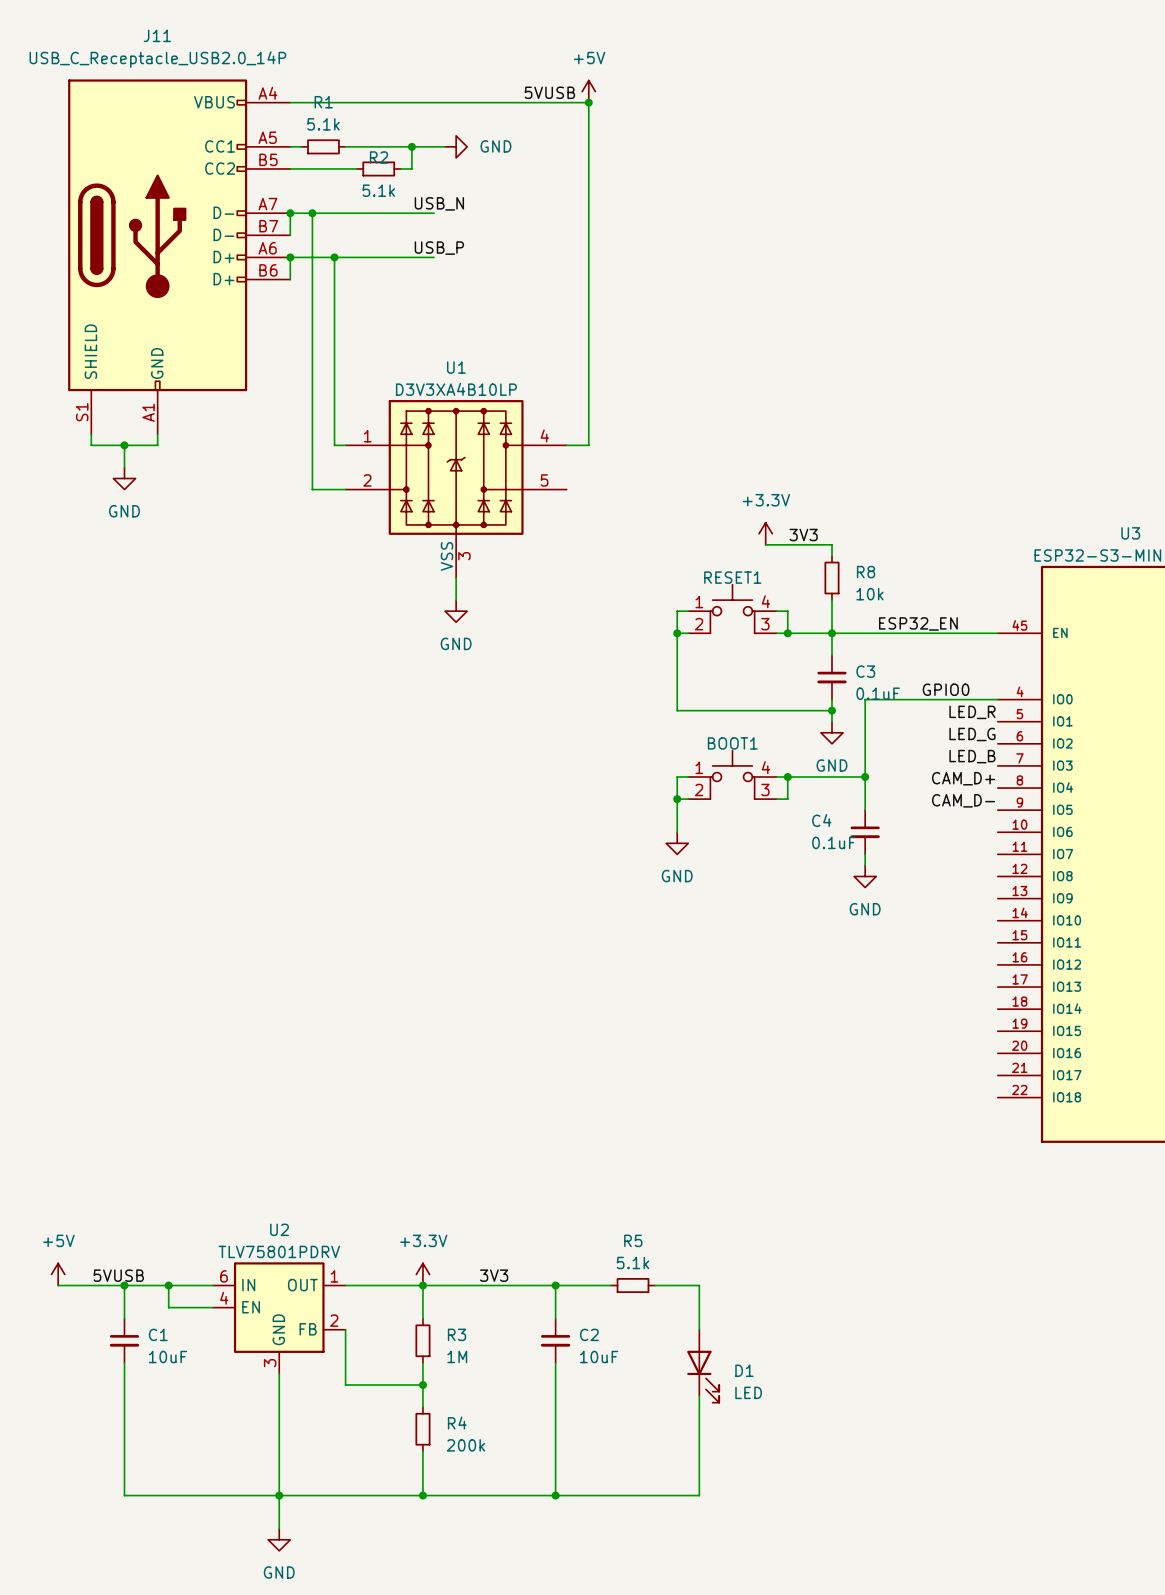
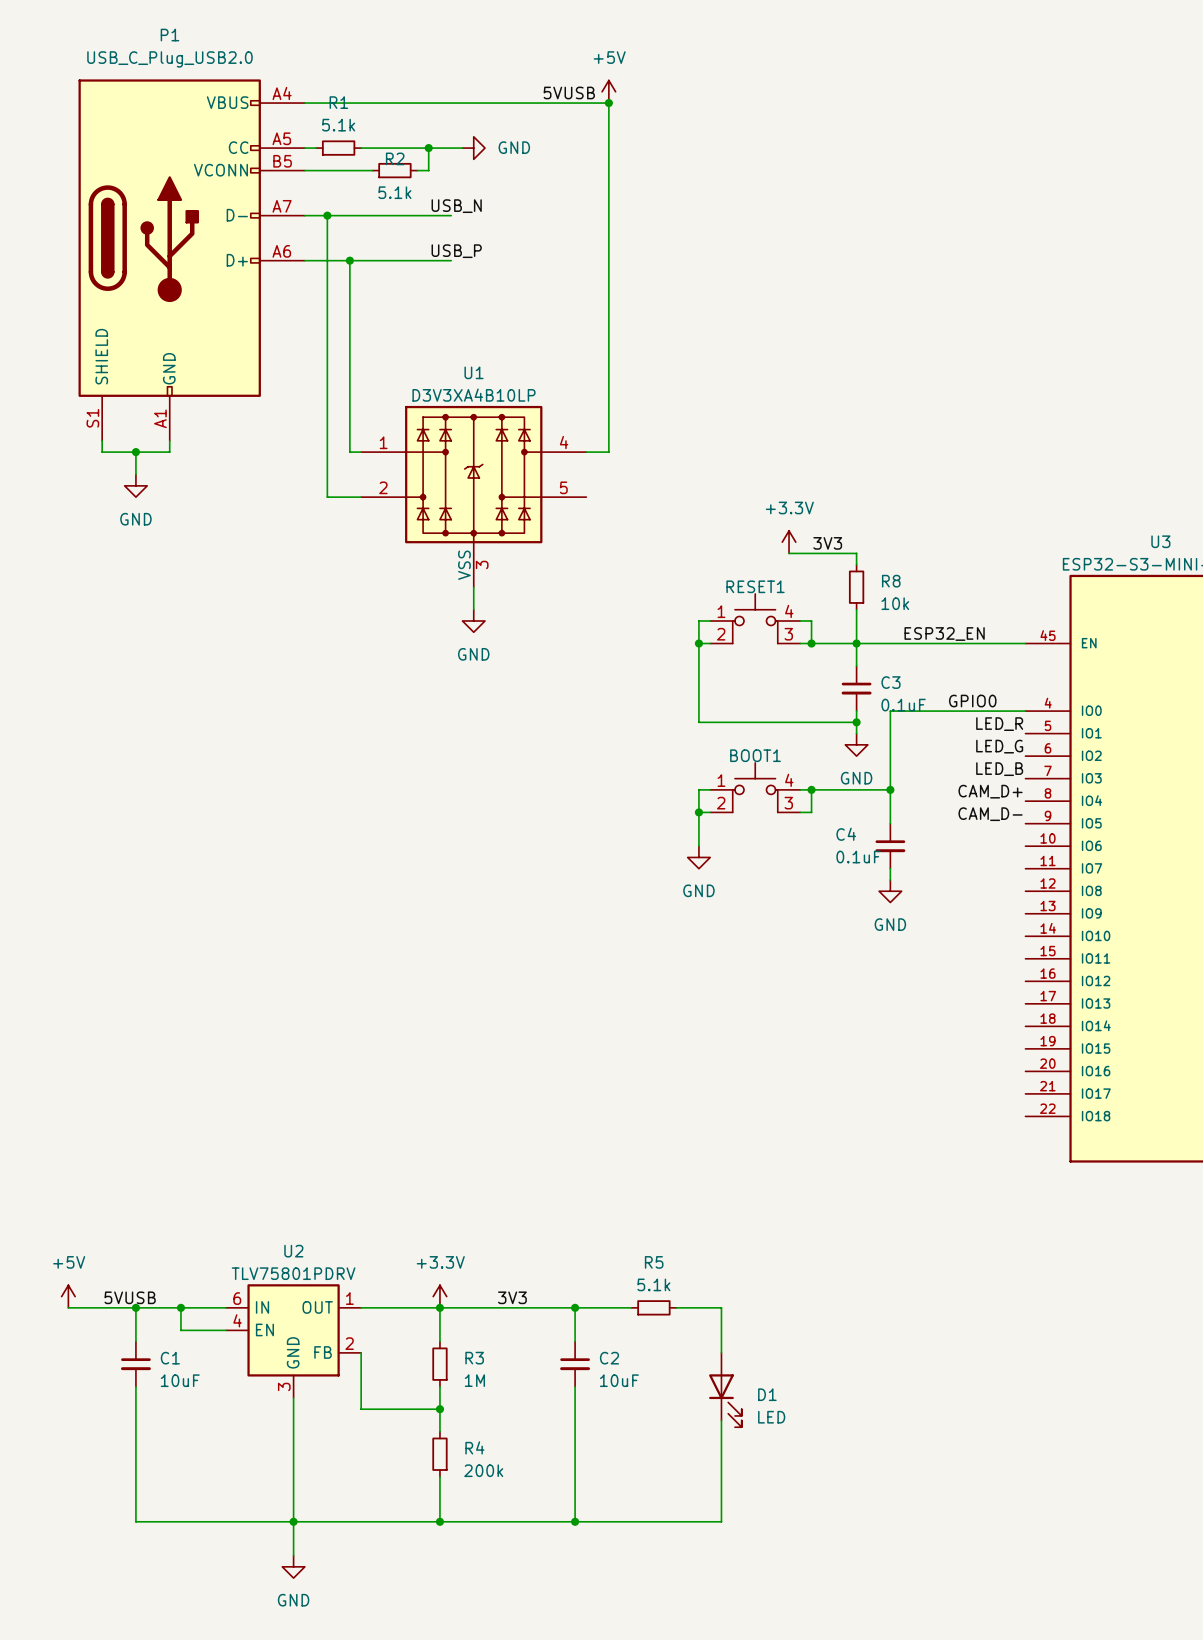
wire: (290, 213) (290, 235) -> none
junction: (290, 213) -> none
J11: USB_C_Receptacle_USB2.0_14P (179, 256) -> none
P1: none -> USB_C_Plug_USB2.0 (191, 260)
wire: (290, 257) (290, 279) -> none
junction: (290, 257) -> none

